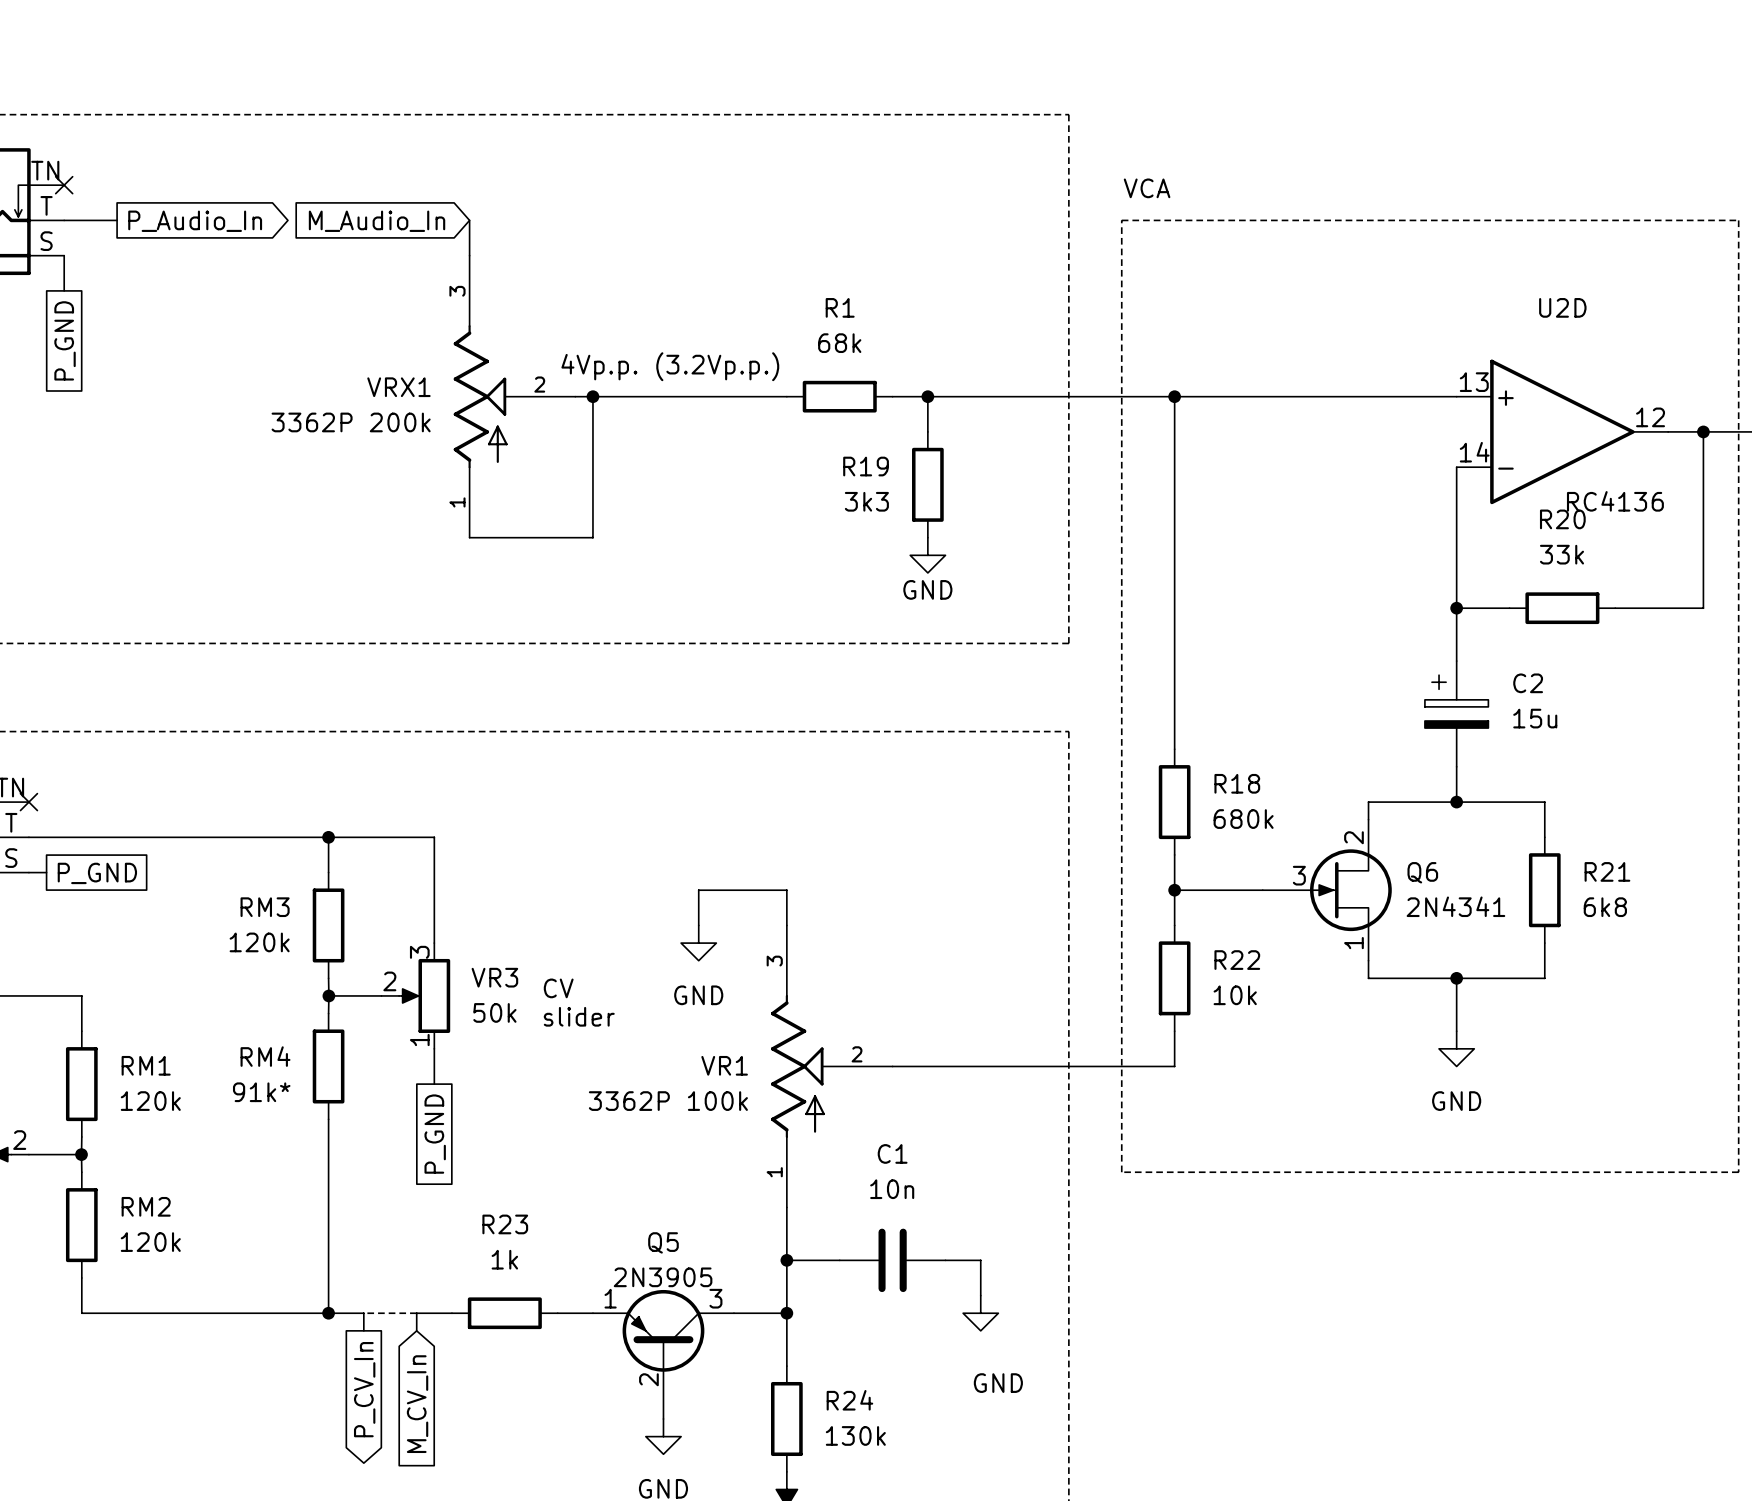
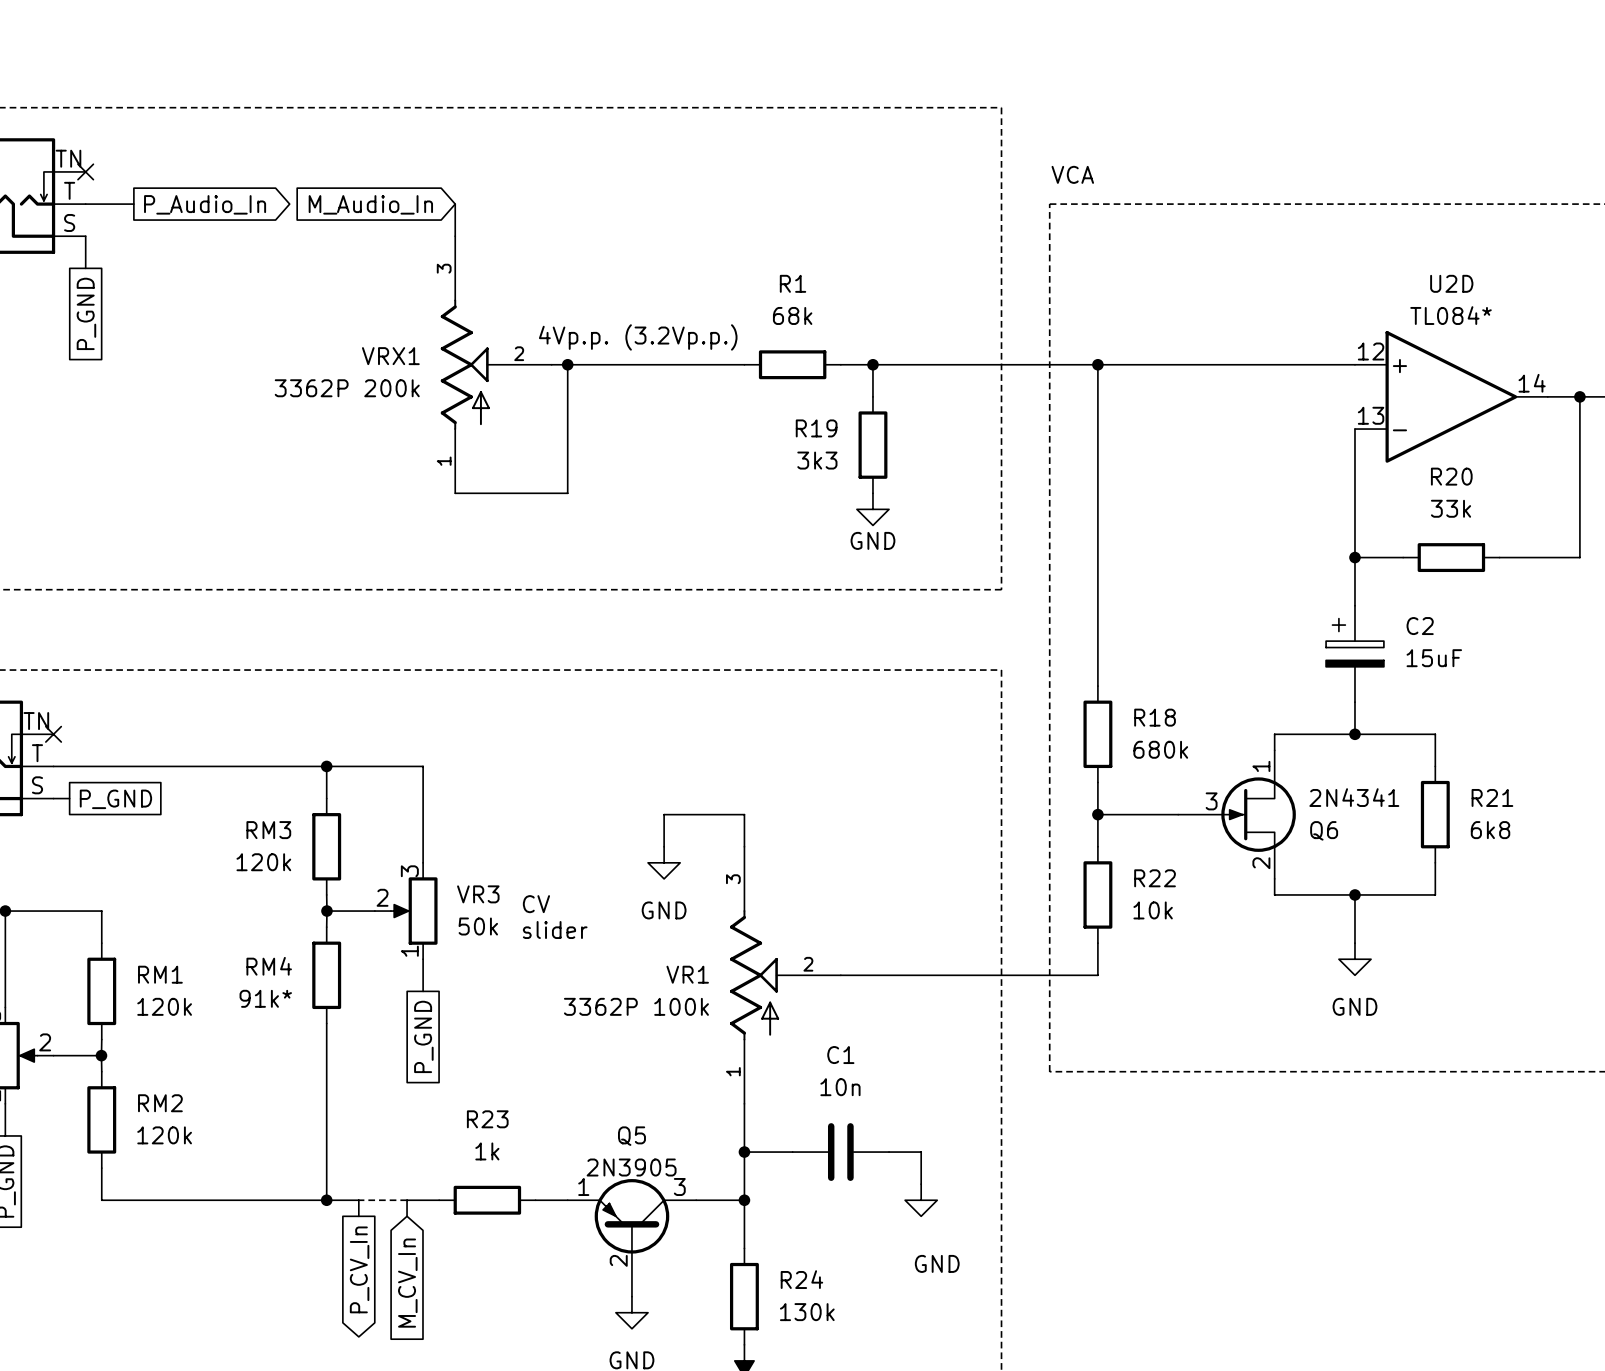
U2D pin number: 13 (1474, 382) -> 12 (1371, 351)
U2D pin number: 12 (1650, 417) -> 14 (1532, 383)
U2D pin number: 14 (1474, 452) -> 13 (1371, 415)
U2D value: RC4136 (1615, 501) -> TL084* (1451, 315)
C2 value: 15u (1535, 718) -> 15uF (1434, 658)
Q6 flip: as is (1350, 890) -> up-down (1258, 814)

